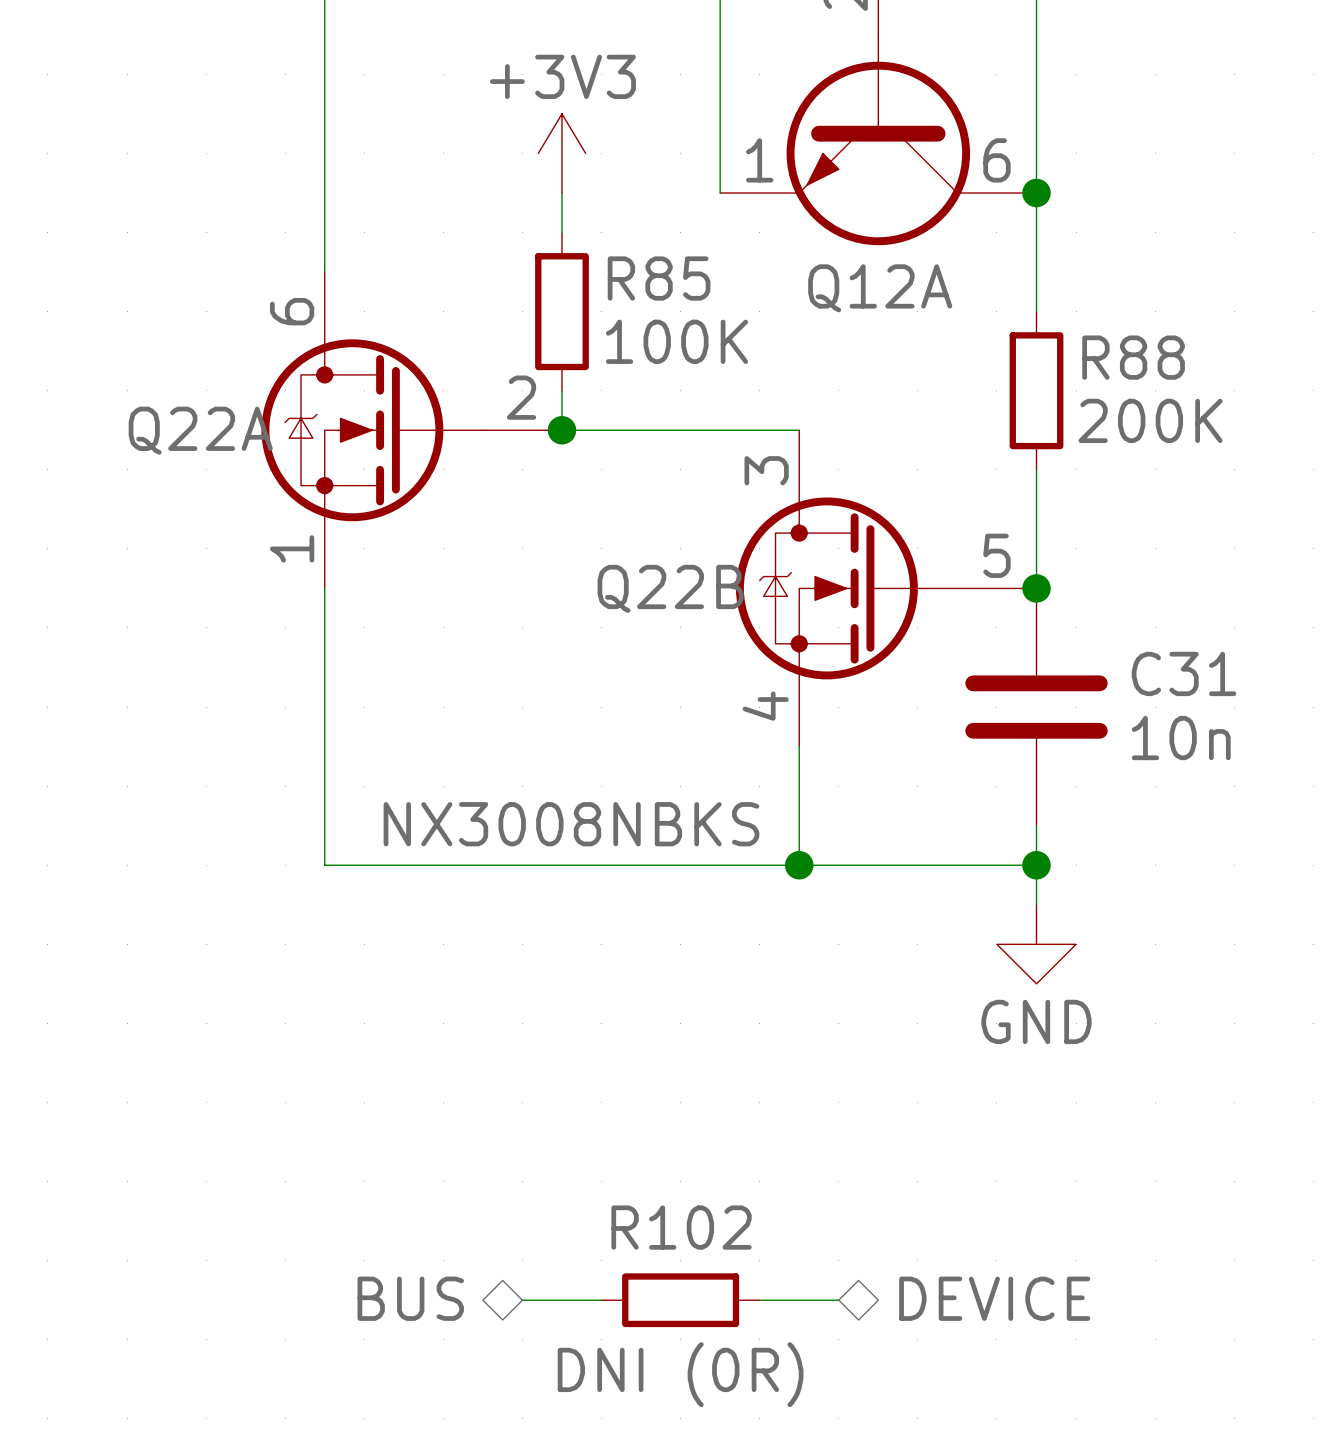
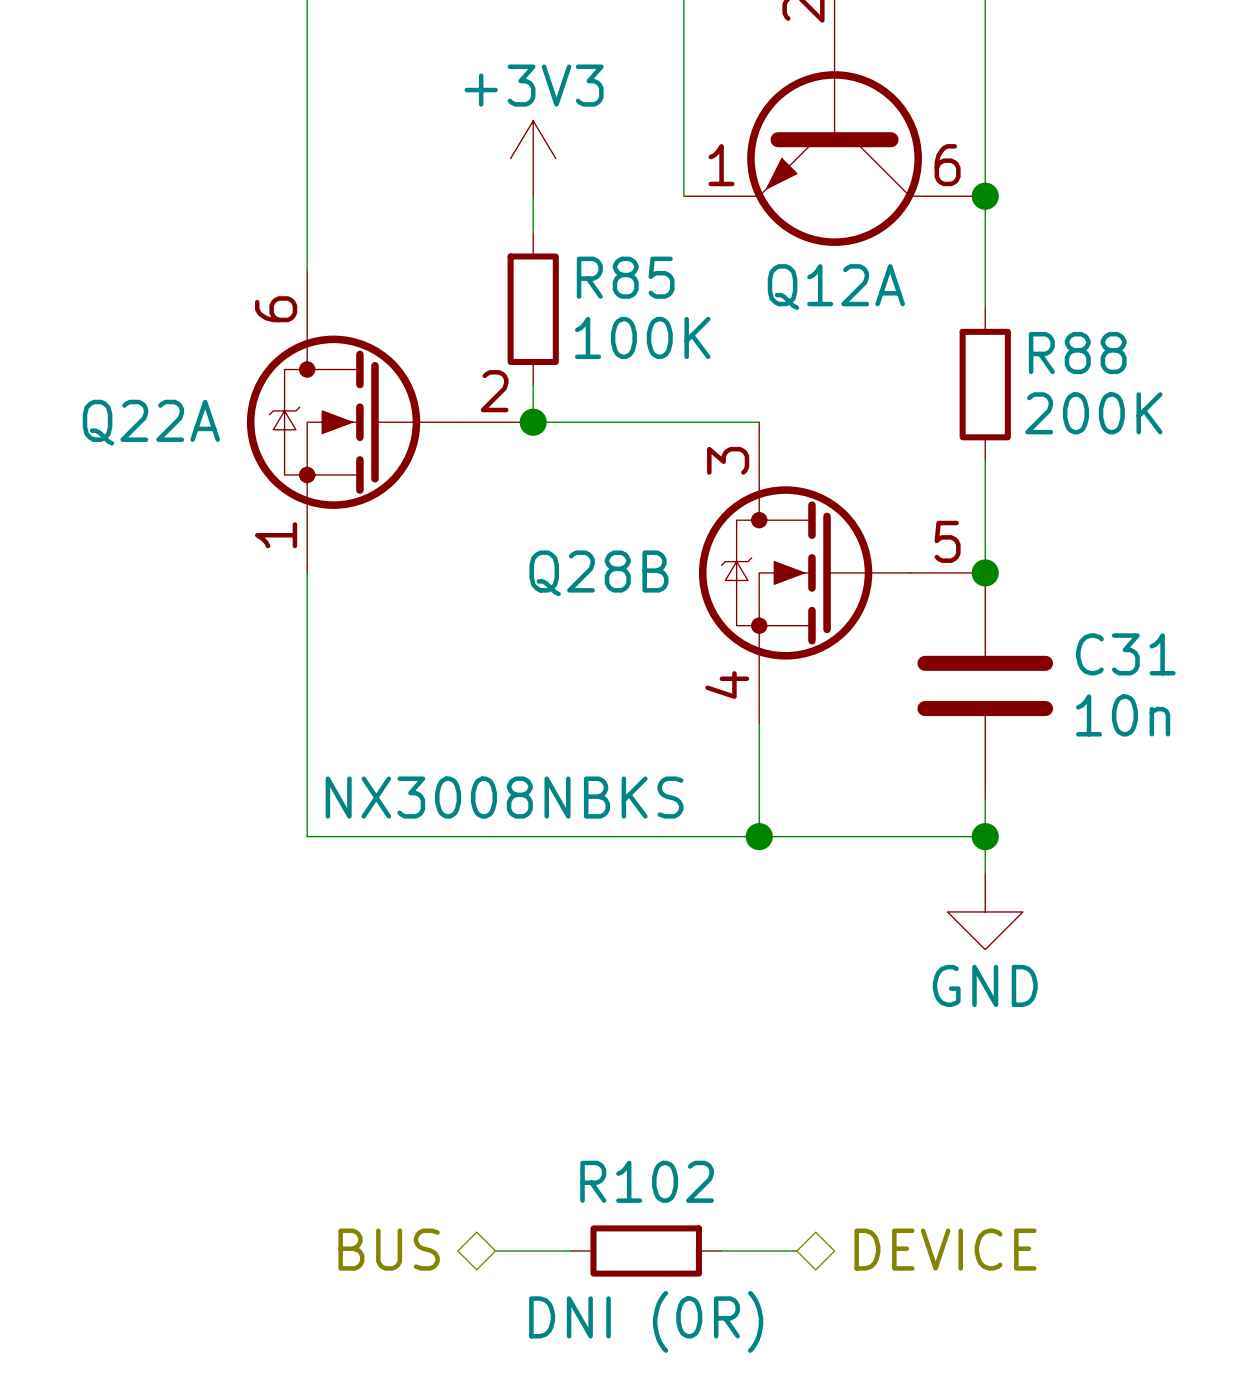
Q22A name position: Q22A (200, 430) -> Q22A (151, 422)
Q22B name: Q22B (670, 588) -> Q28B (598, 573)
Q22A value position: NX3008NBKS (571, 824) -> NX3008NBKS (504, 797)

